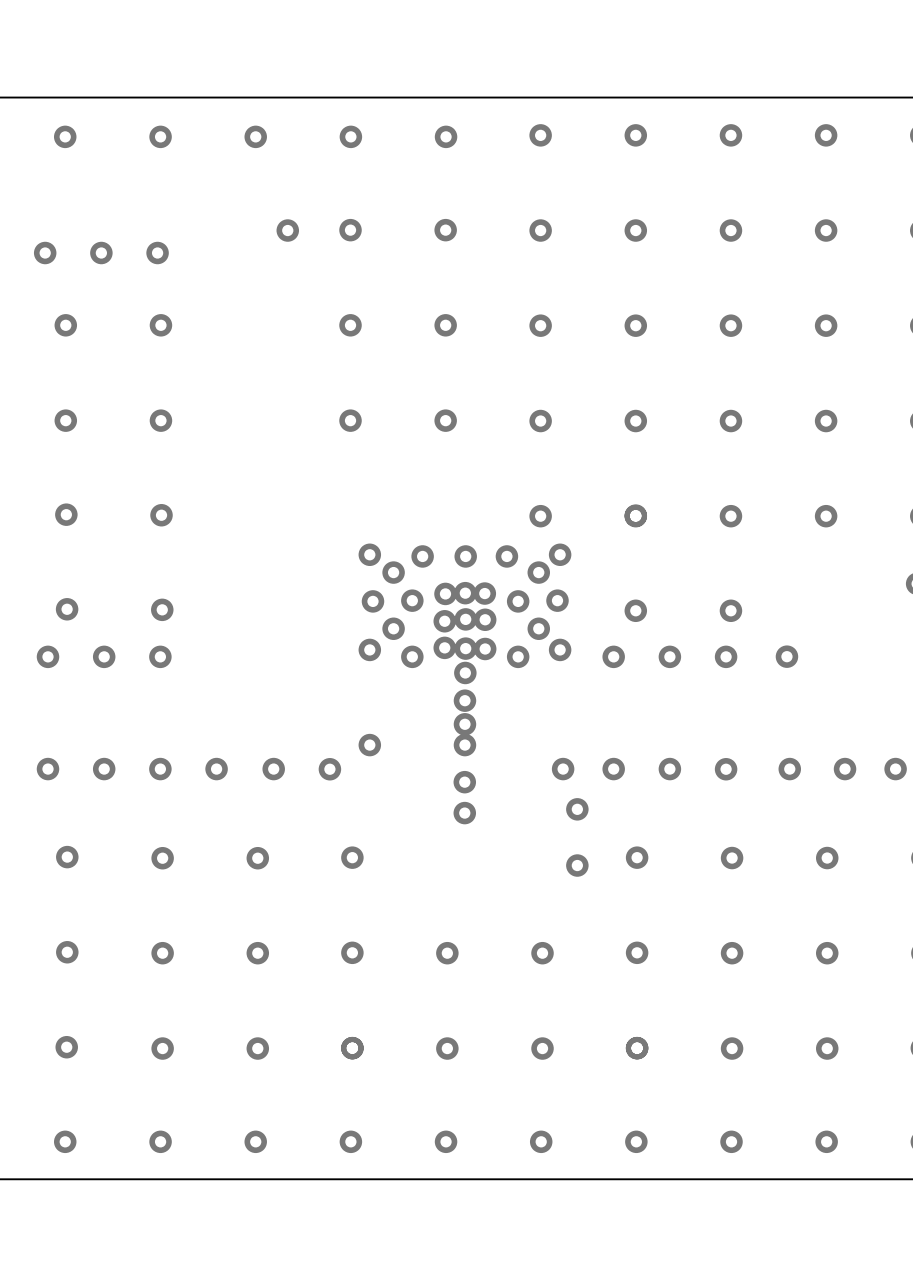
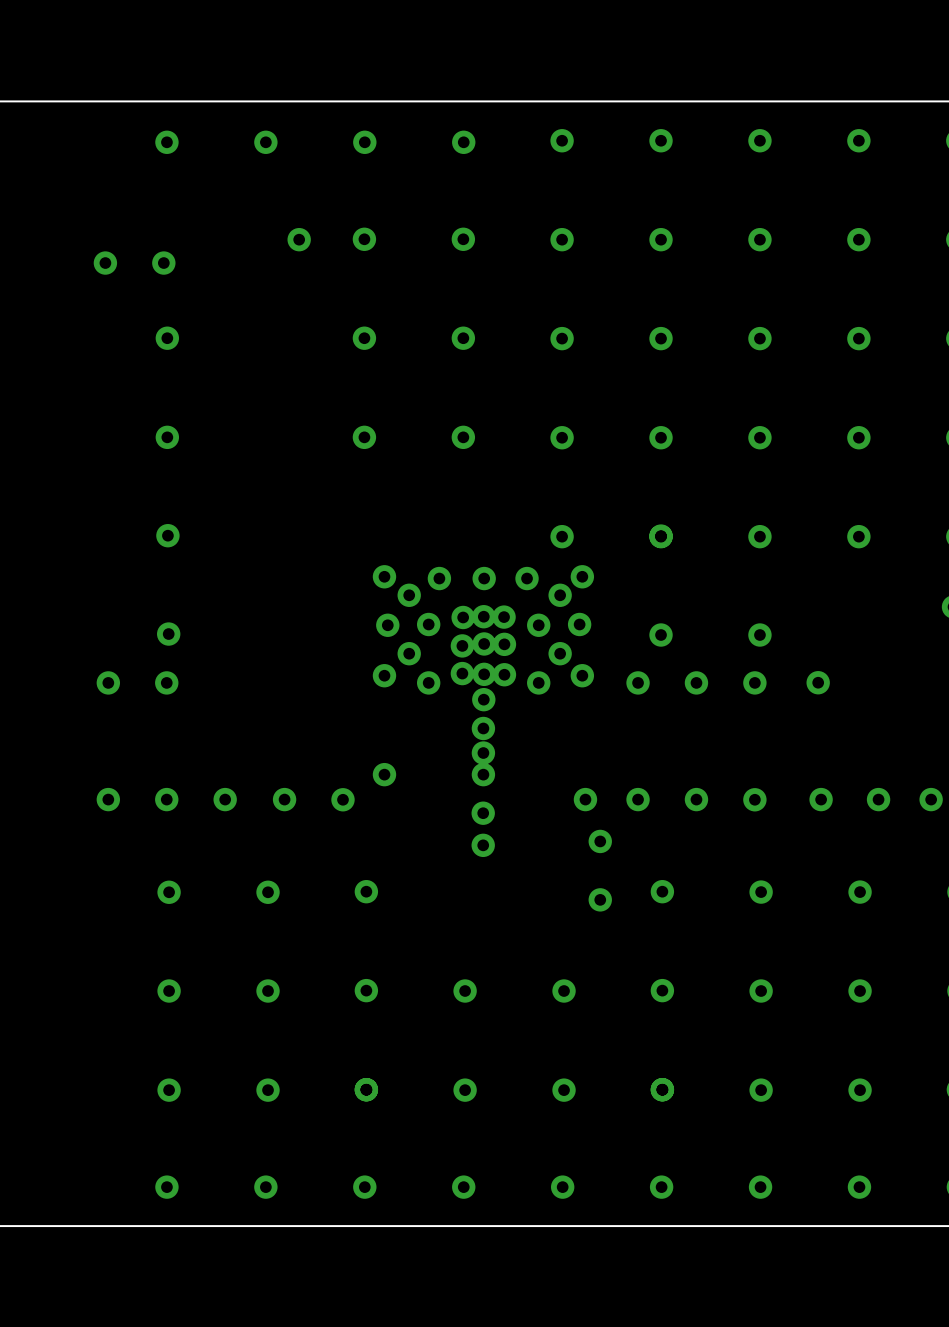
via: (65, 136) -> none
via: (45, 253) -> none
via: (65, 325) -> none
via: (65, 420) -> none
via: (66, 514) -> none
via: (67, 609) -> none
via: (48, 656) -> none
via: (48, 769) -> none
via: (67, 857) -> none
via: (67, 952) -> none
via: (66, 1047) -> none
via: (65, 1141) -> none

